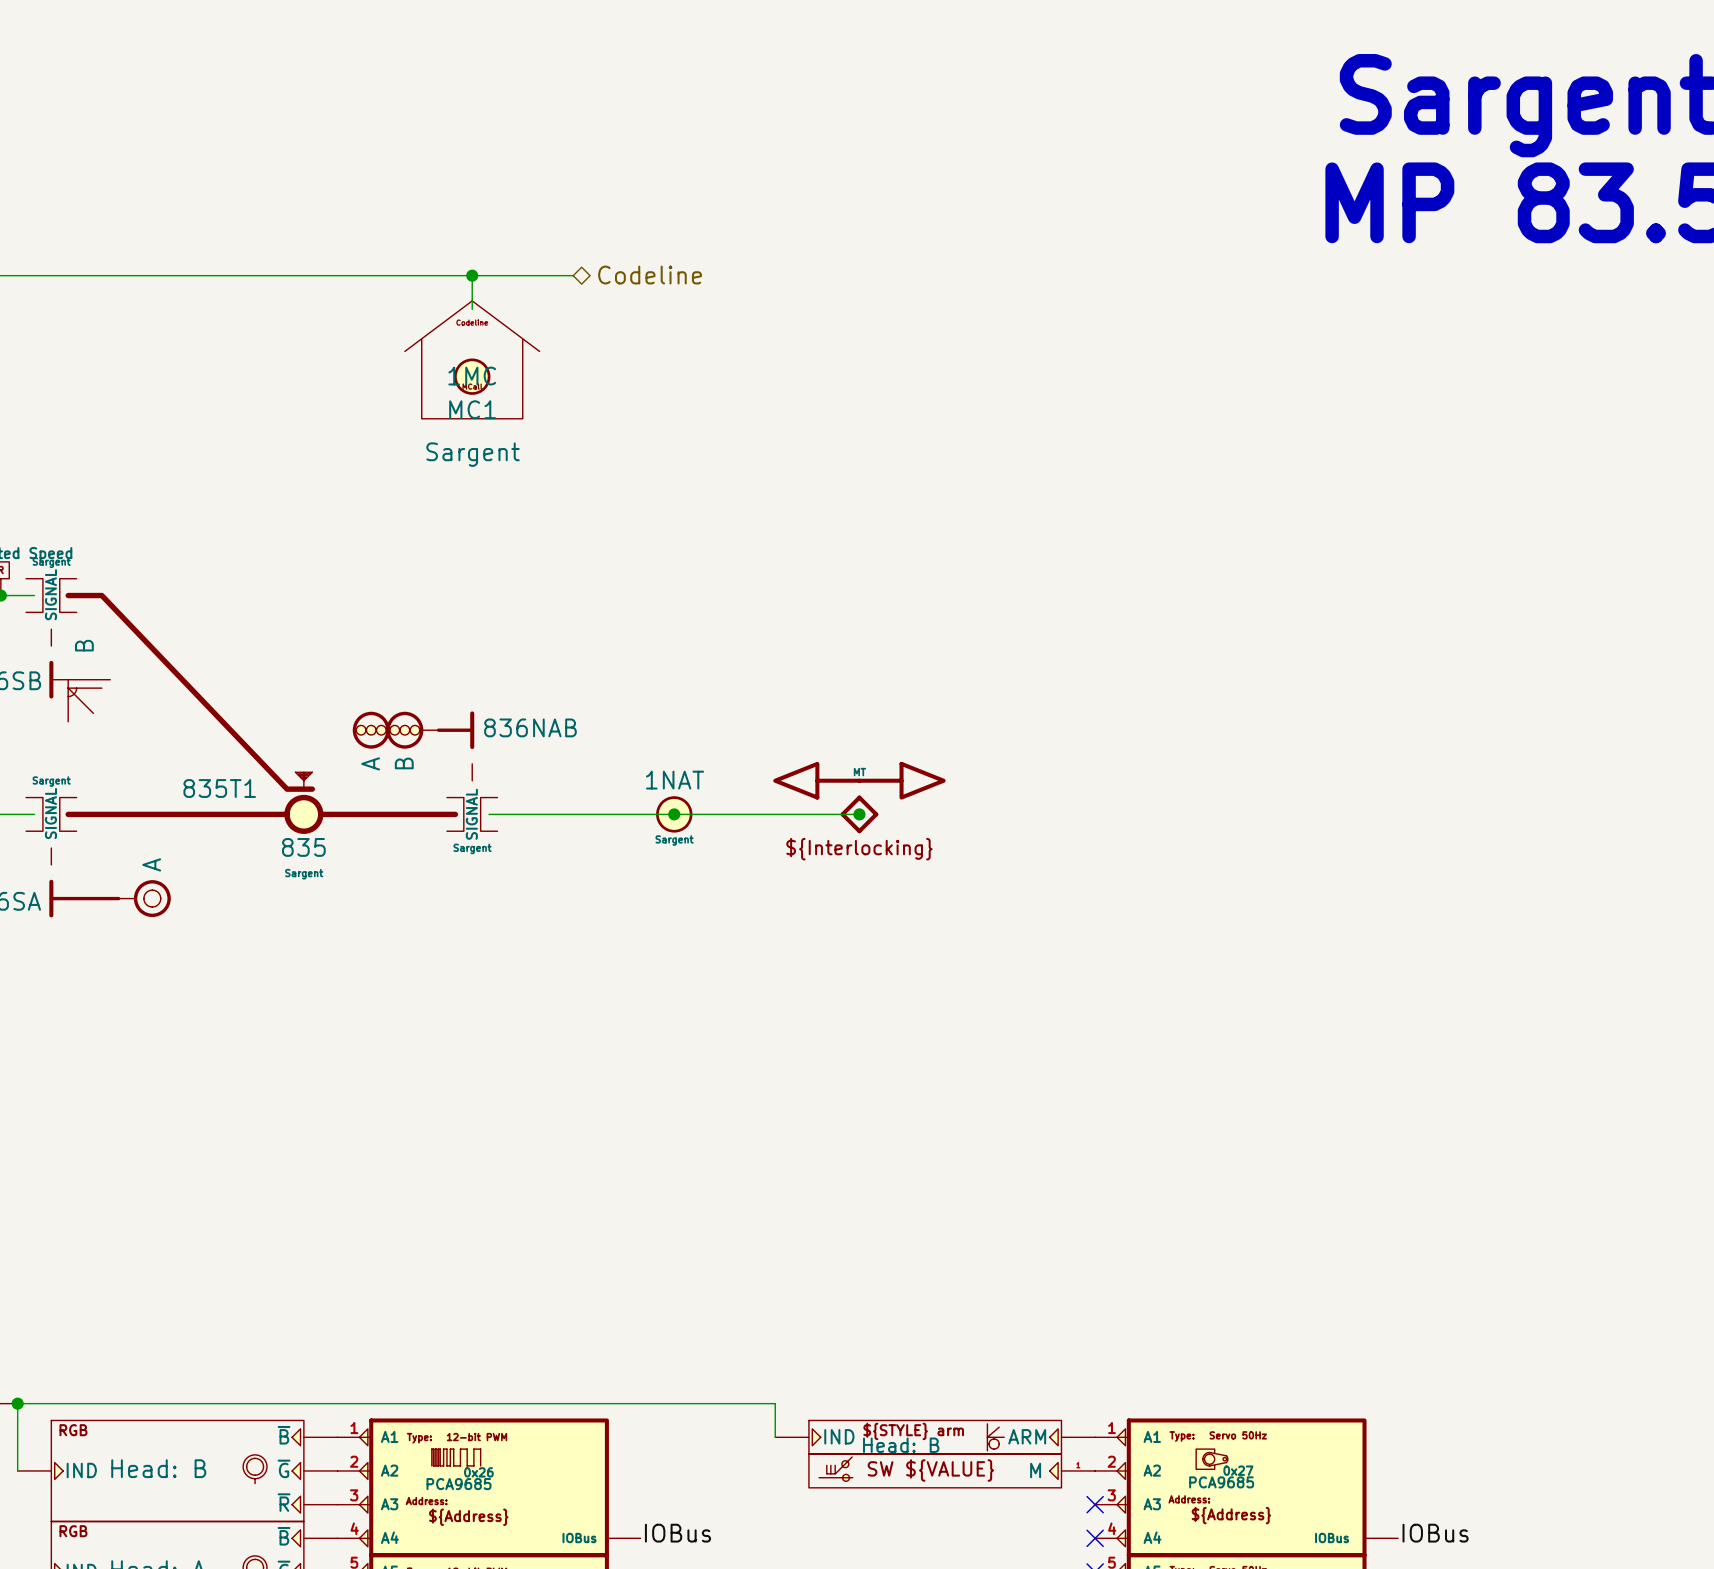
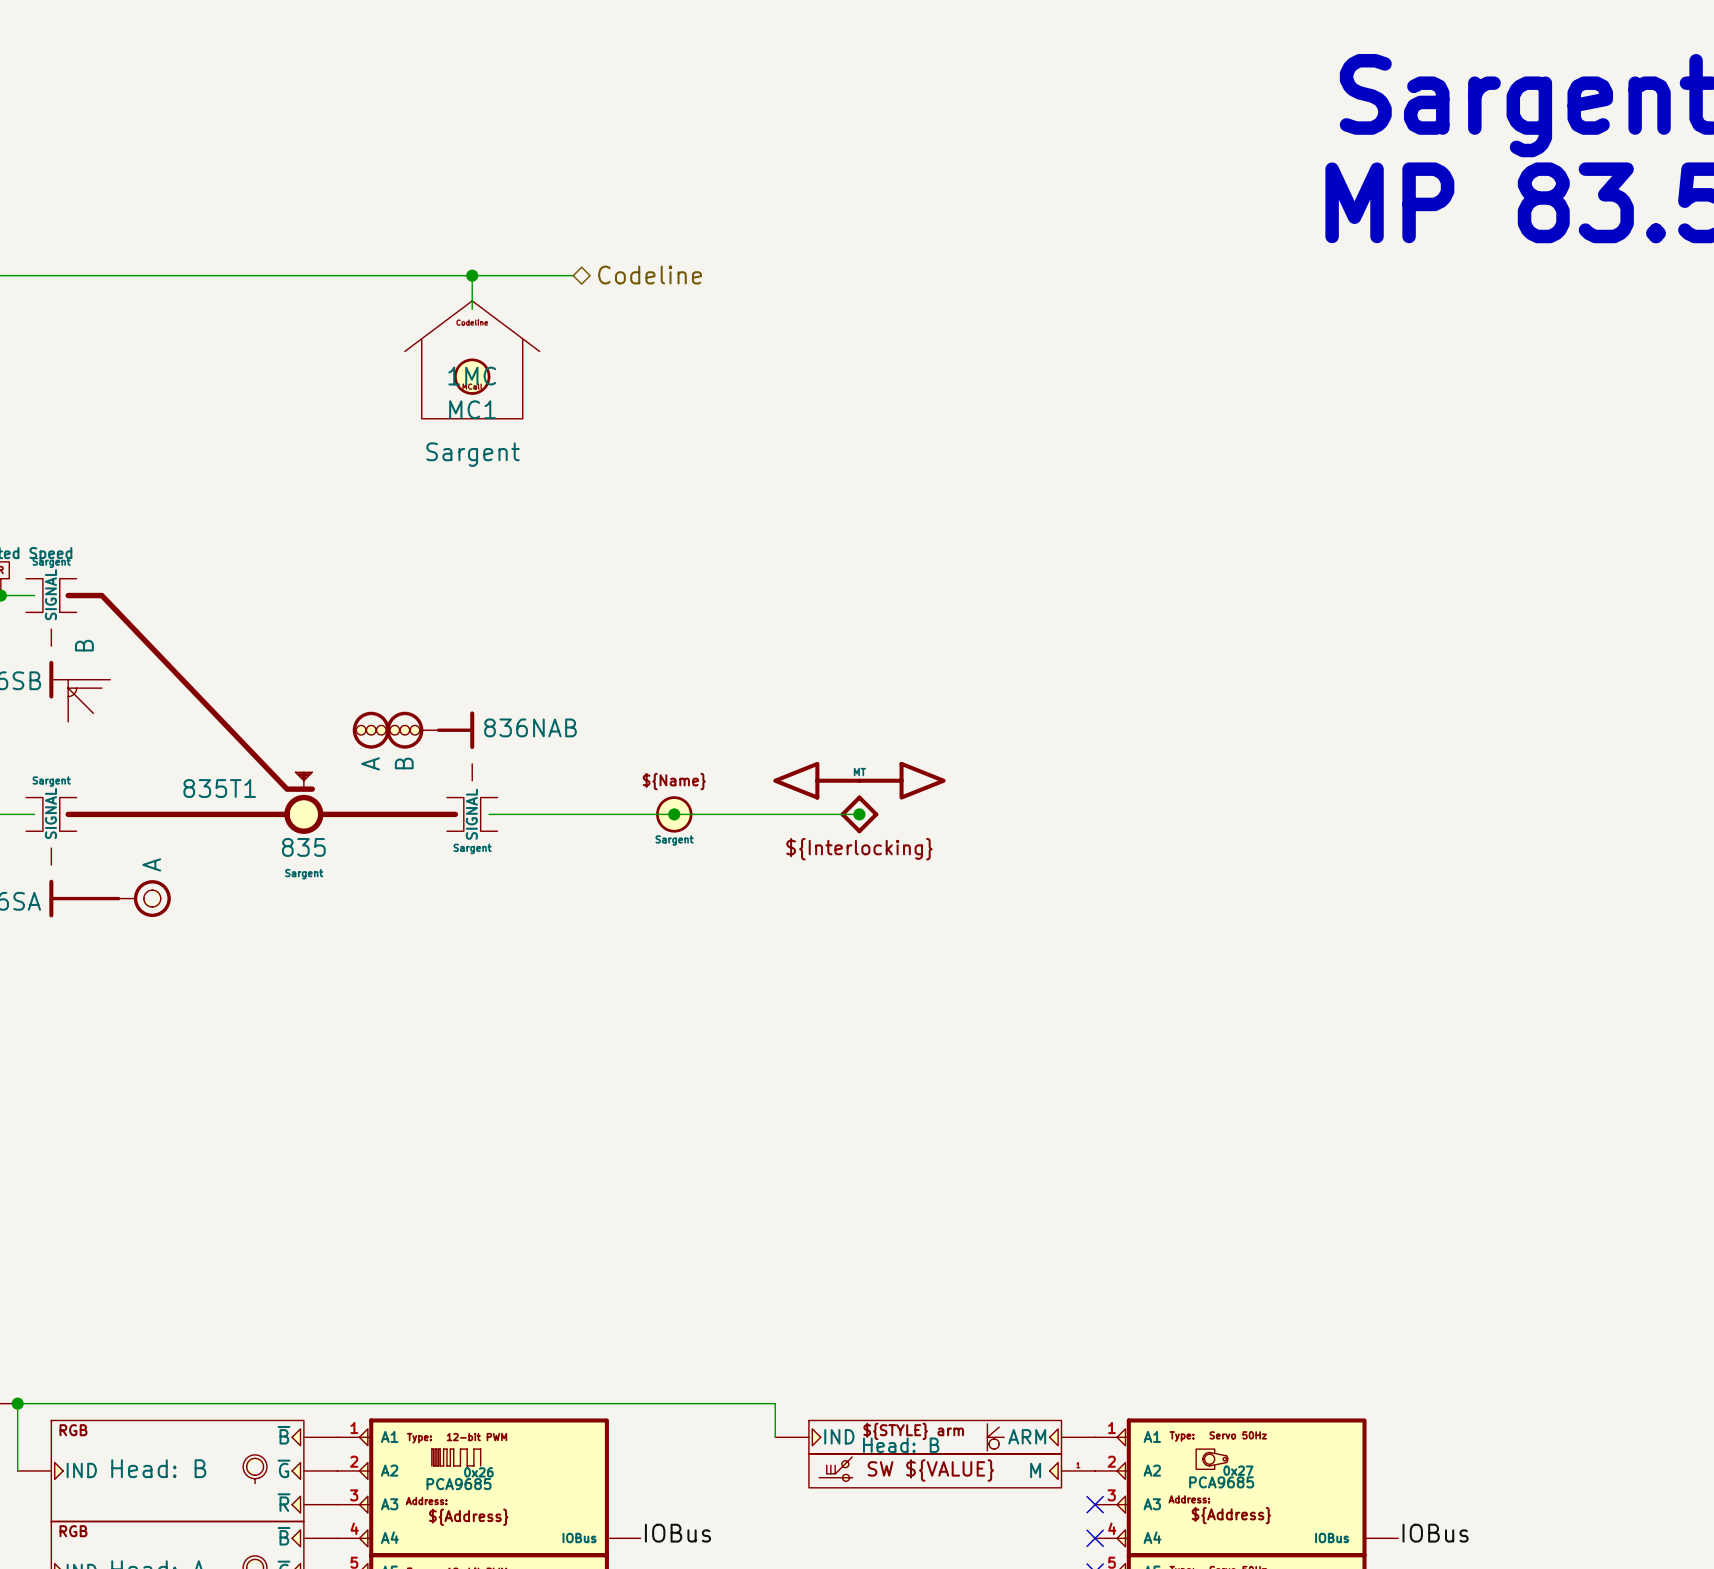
part value: 1NAT (675, 780) -> none
part text: none -> ${Name} (674, 781)

